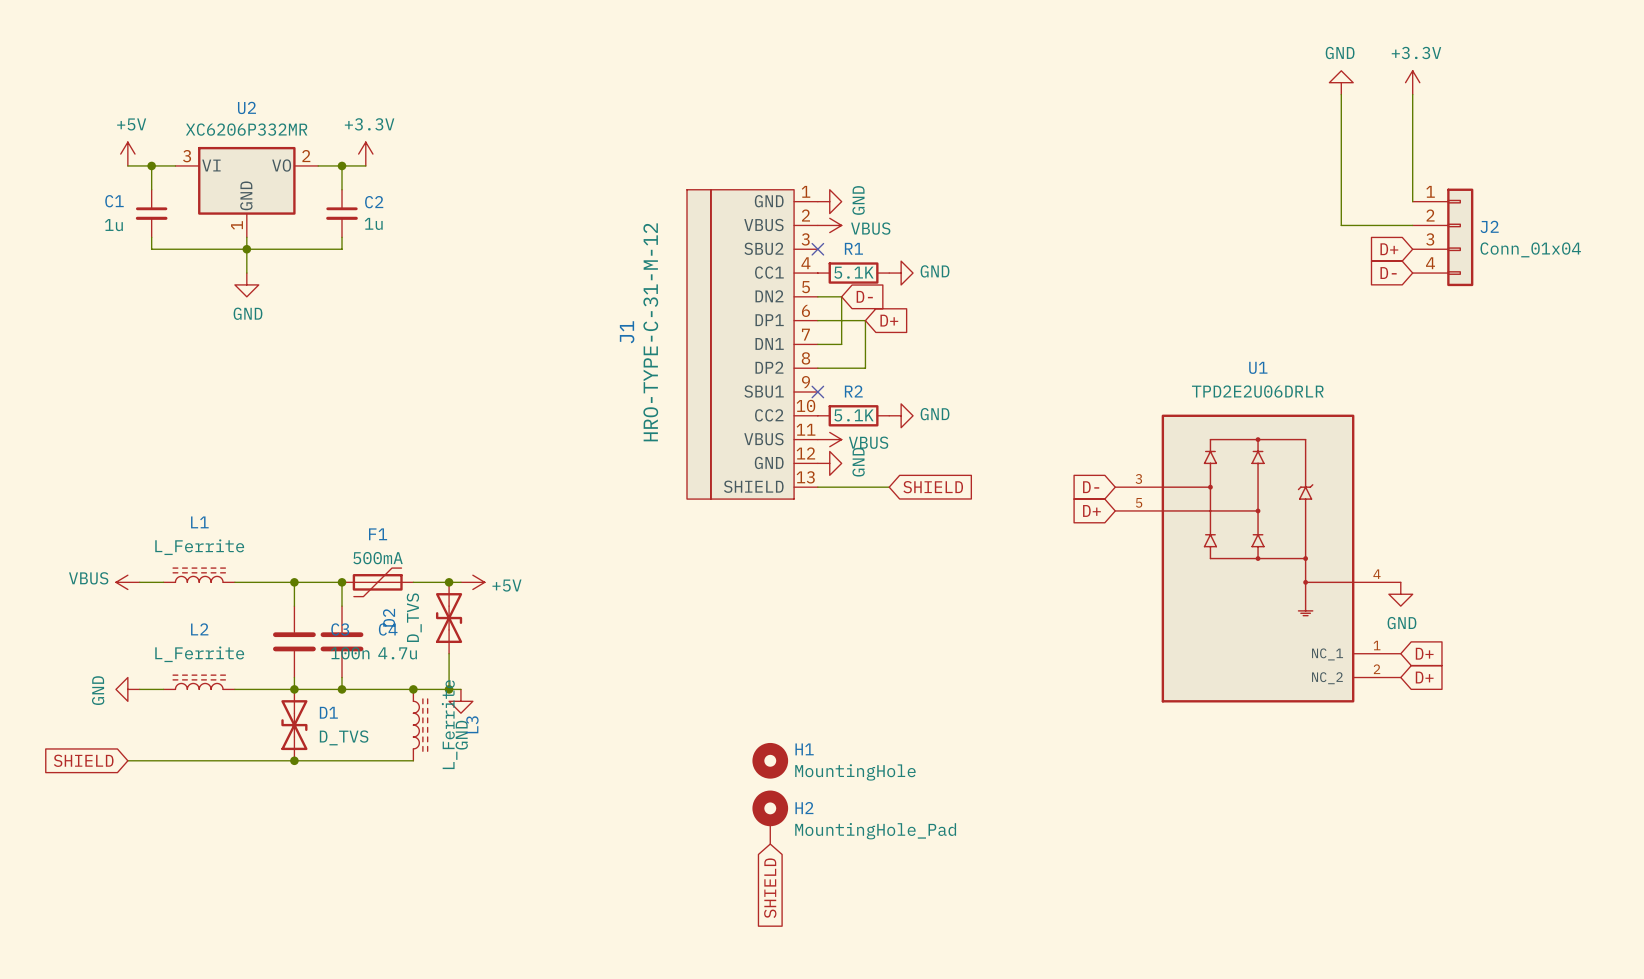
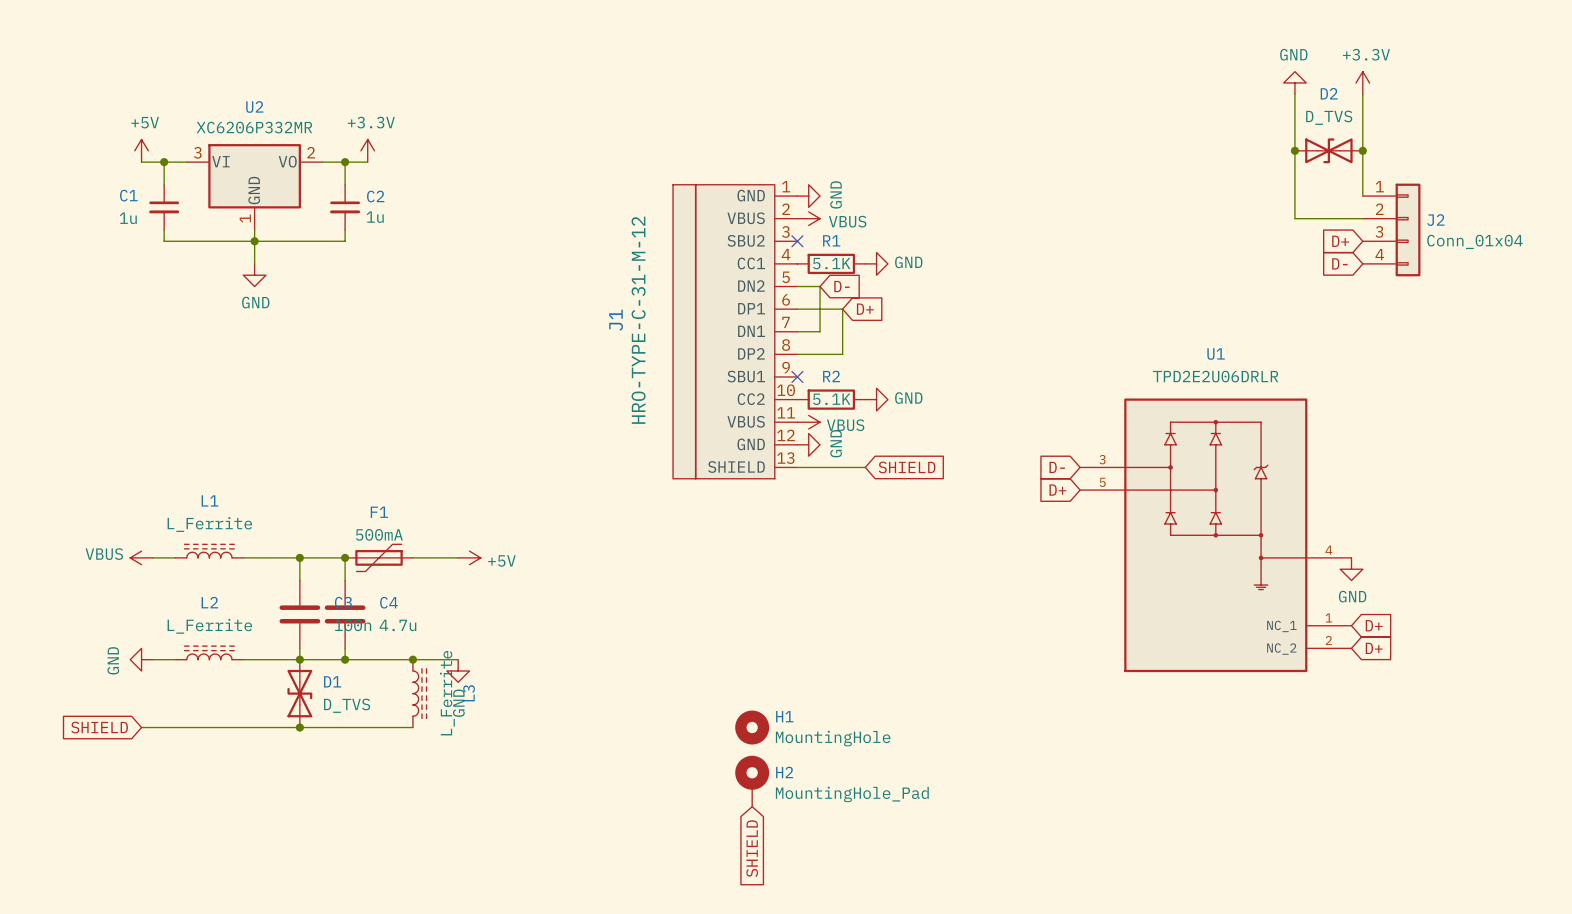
junction: none -> (1294, 150)
junction: none -> (1362, 150)
junction: (449, 582) -> none
D2 rotation: 0° (449, 618) -> 90° clockwise (1328, 150)
D2 position: (449, 618) -> (1328, 150)
wire: (449, 653) (449, 689) -> none
junction: (449, 689) -> none

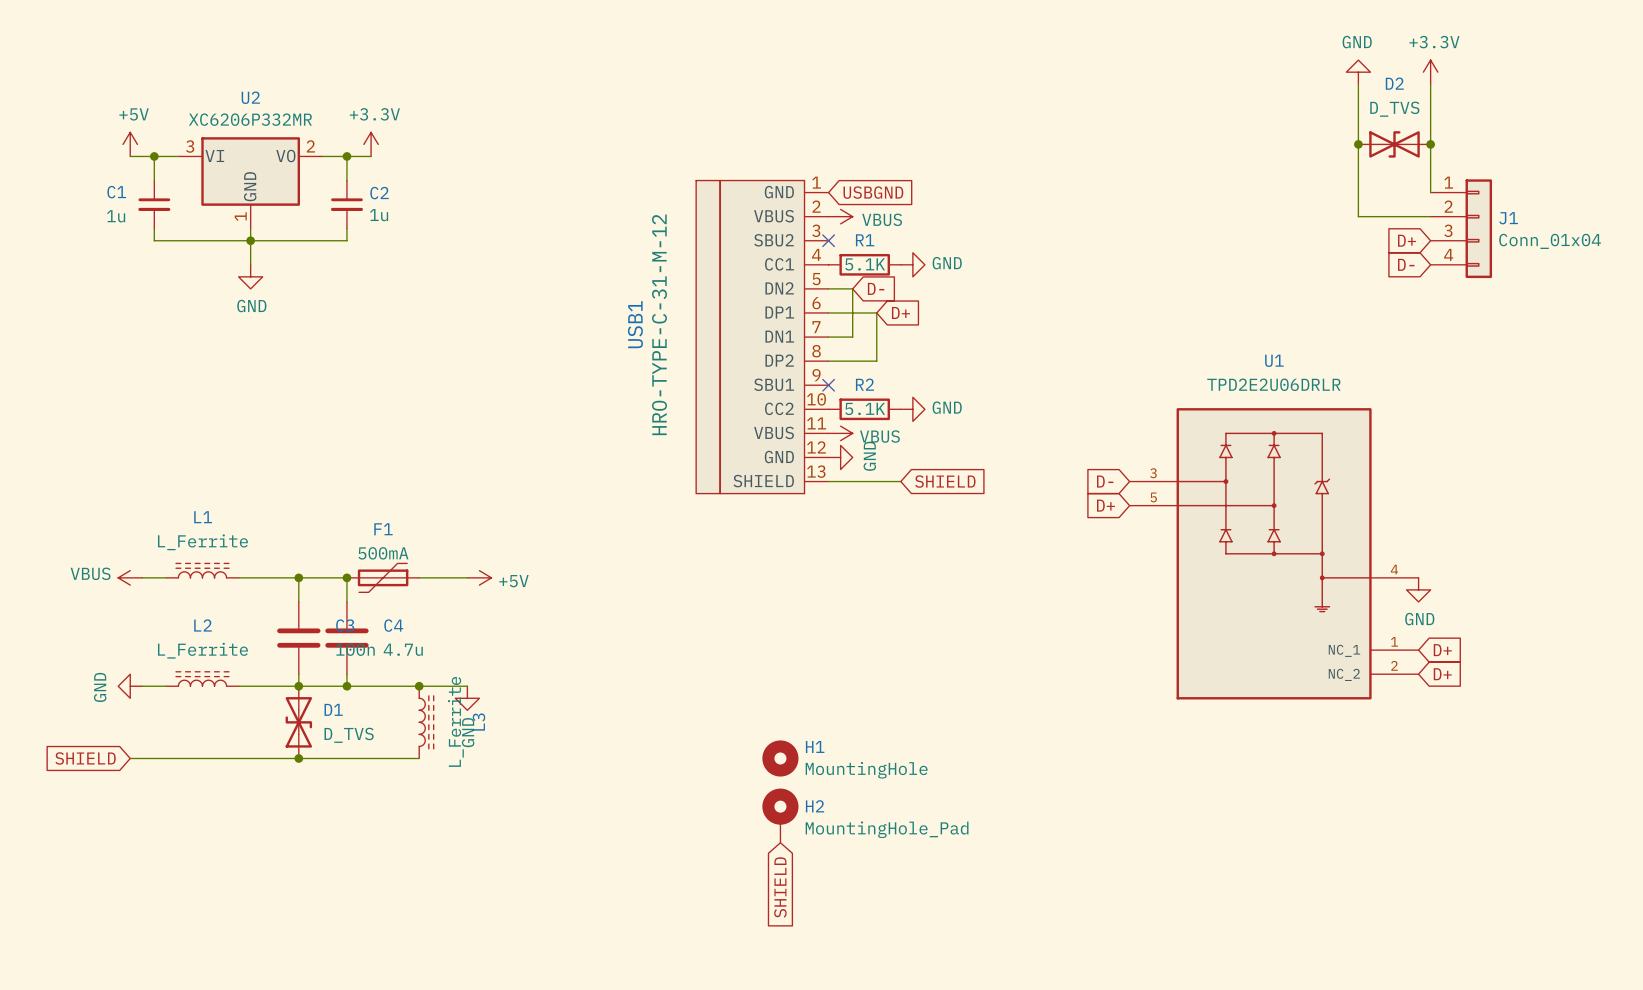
power symbol: GND (808, 196) -> none
global label: none -> USBGND (873, 192)
J2 name: J2 (1435, 220) -> J1 (1508, 218)
J1 name: J1 (616, 320) -> USB1 (635, 324)

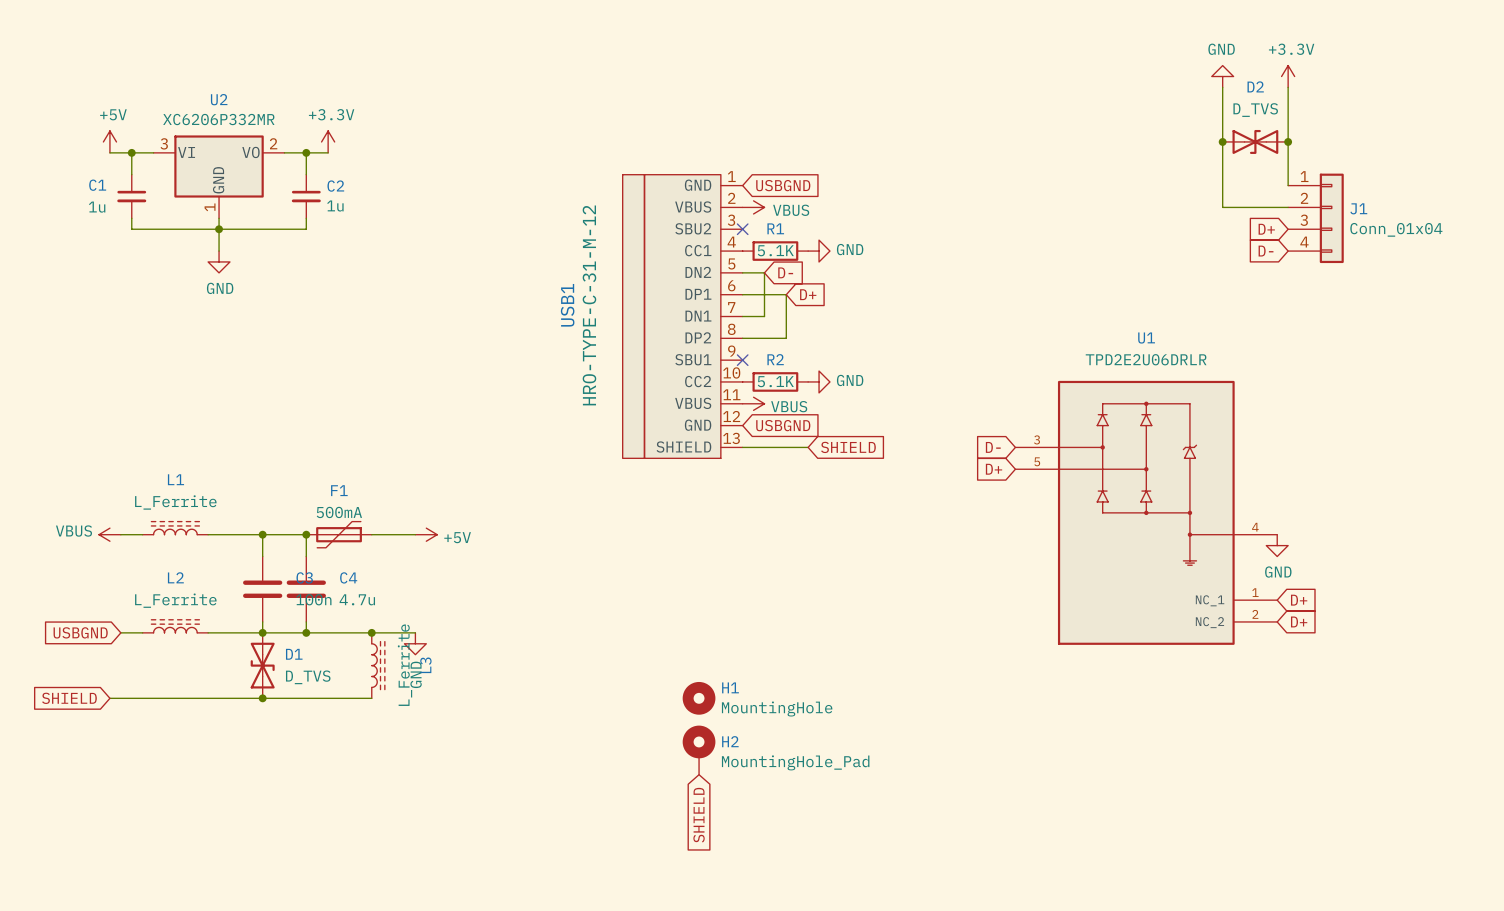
power symbol: GND (840, 457) -> none
global label: none -> USBGND (783, 425)
global label: none -> USBGND (80, 632)
power symbol: GND (130, 686) -> none

